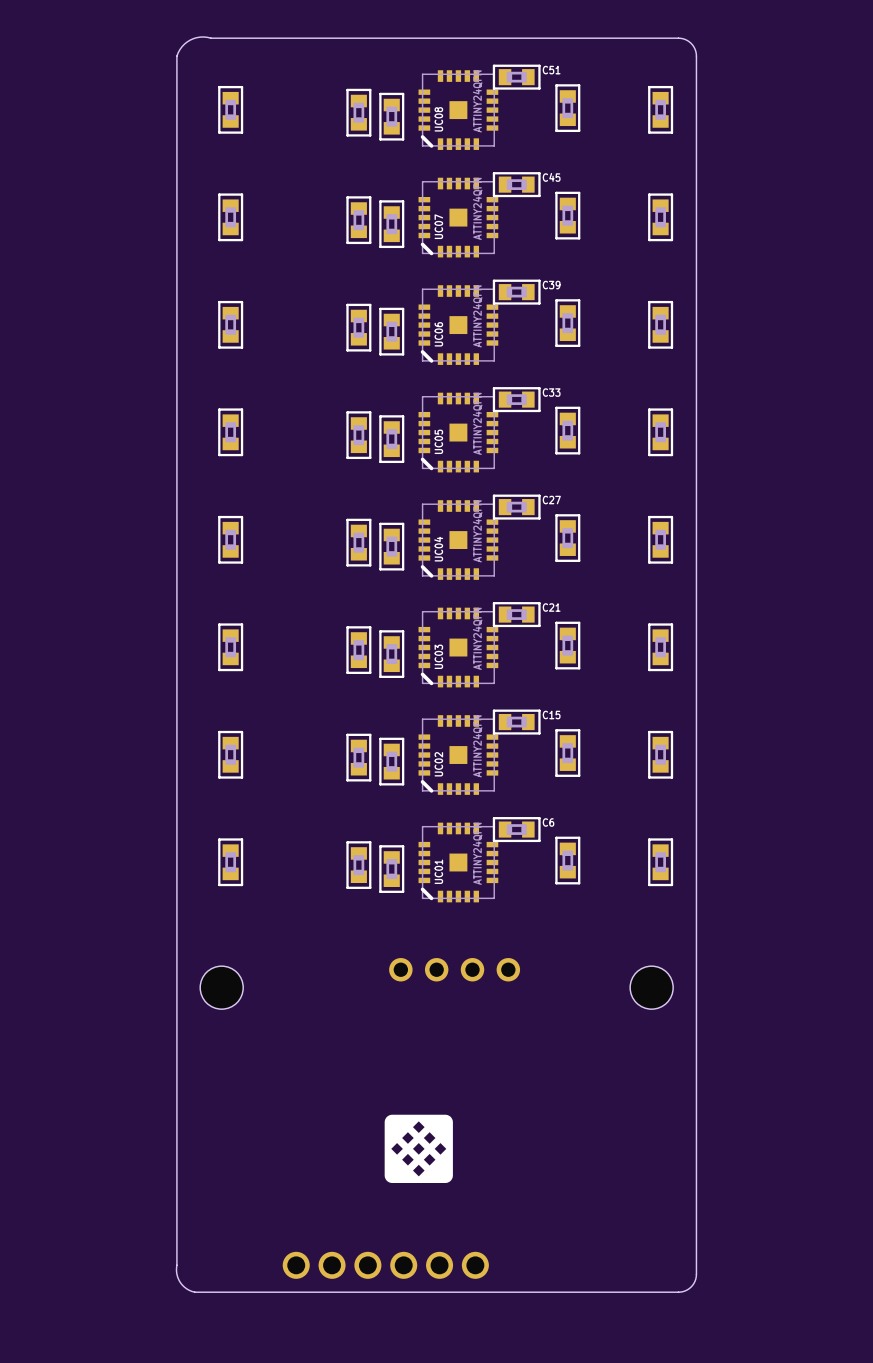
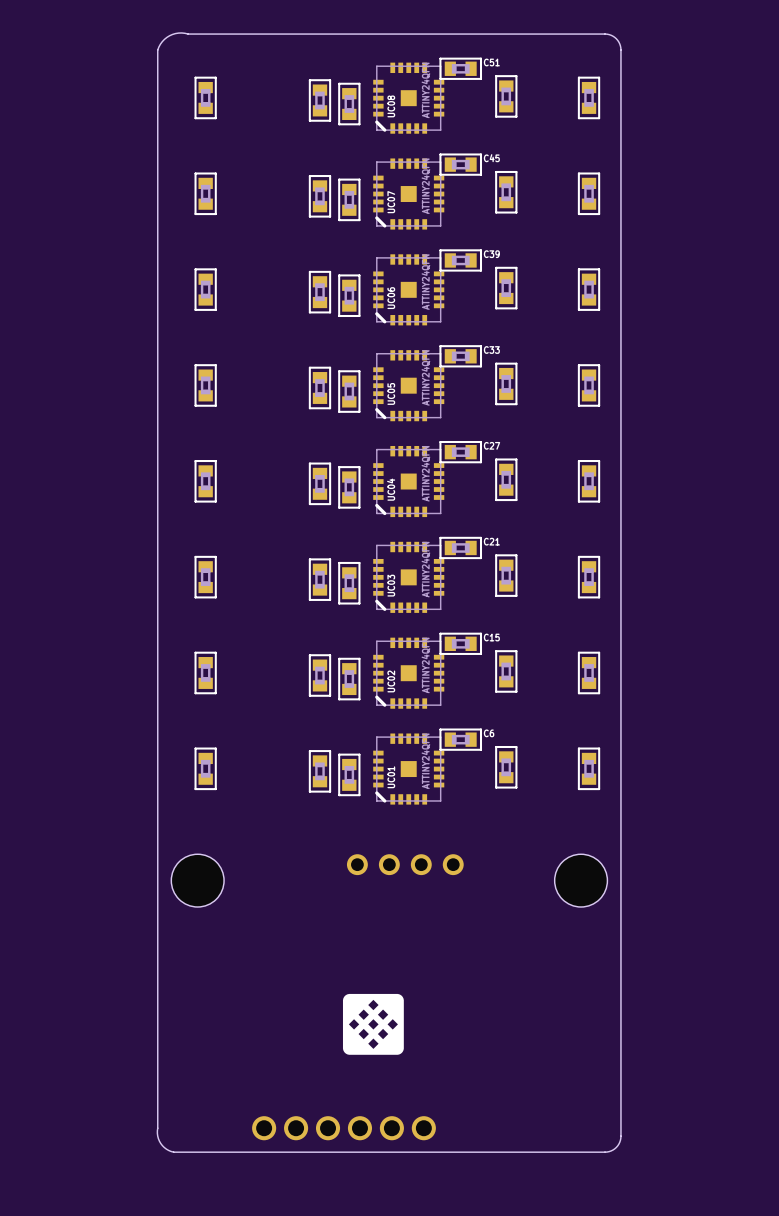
hole: (221, 987) -> none
part: none -> (197, 880)
hole: (651, 987) -> none
part: none -> (581, 880)

